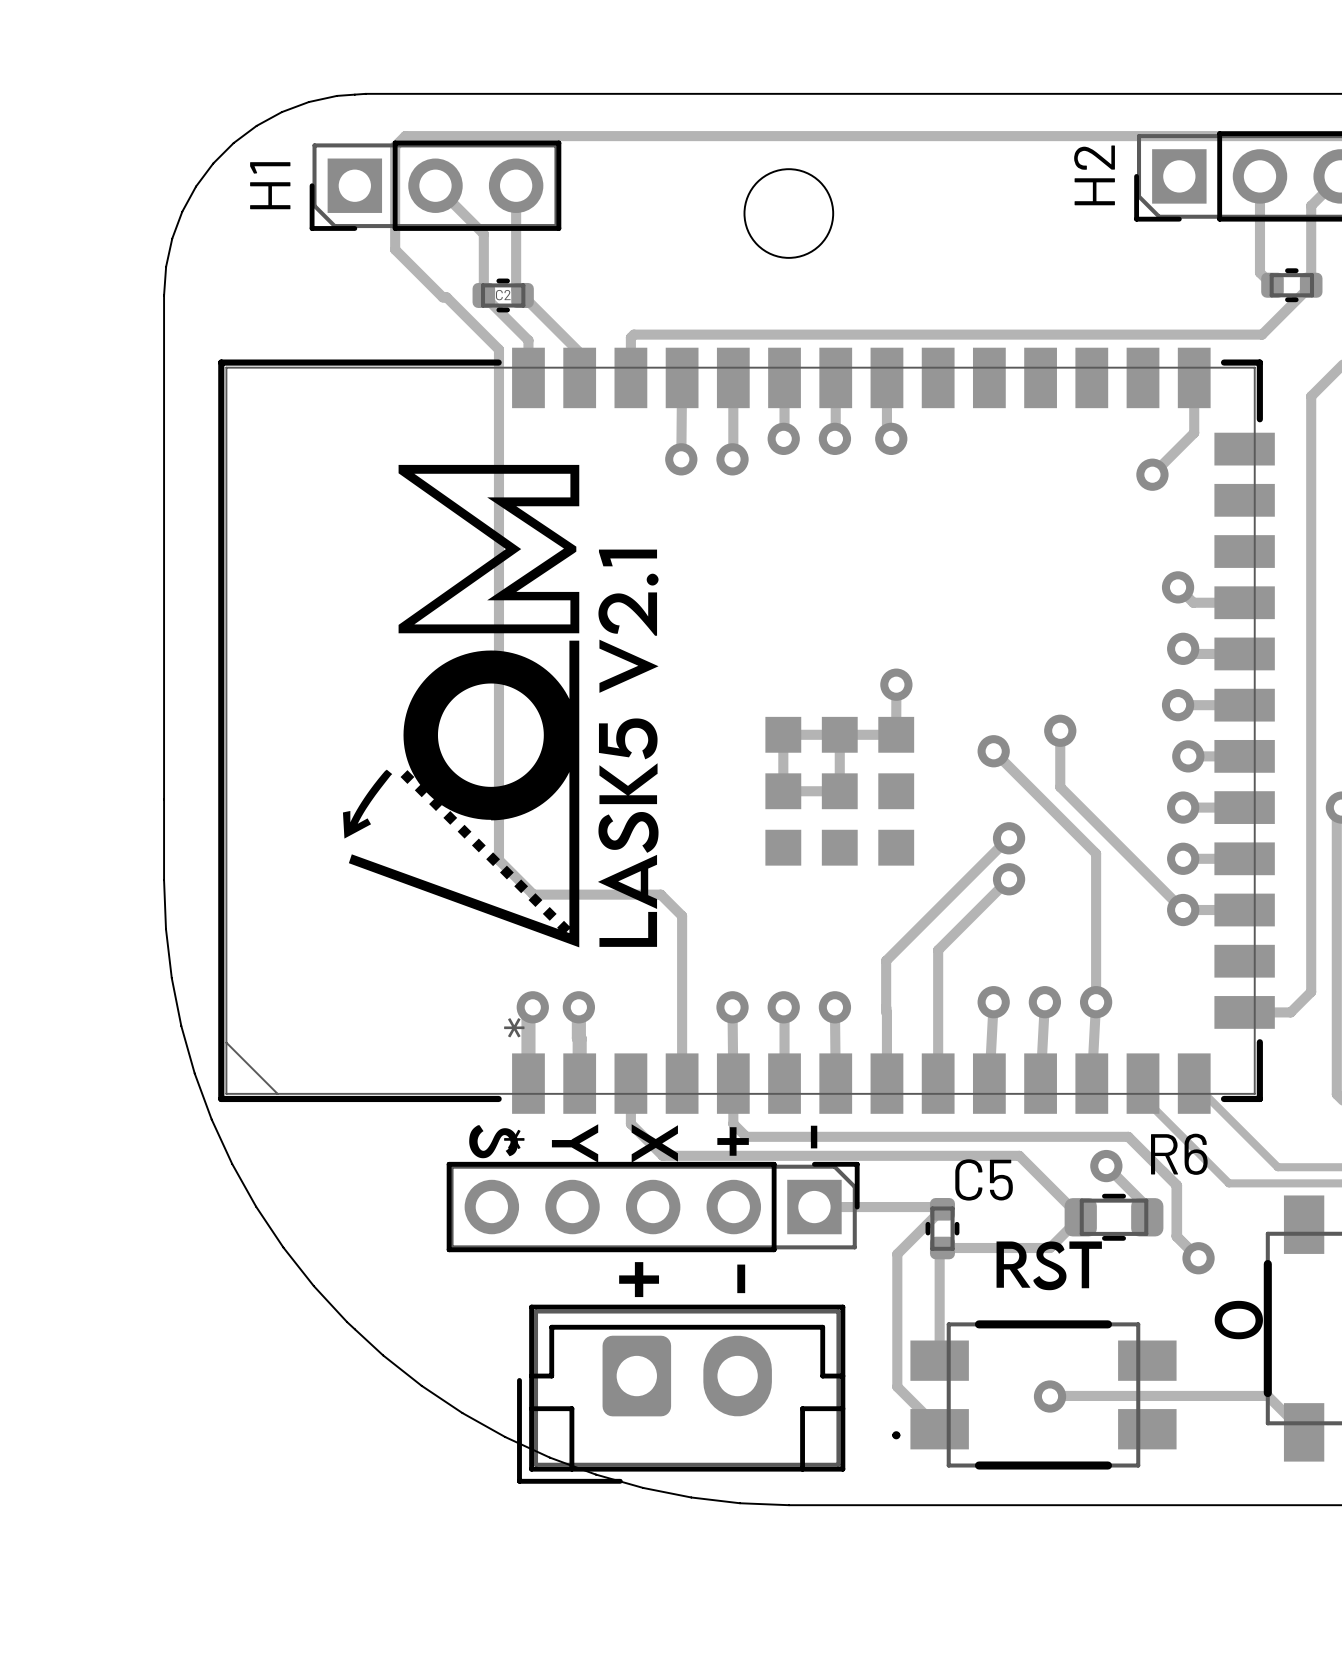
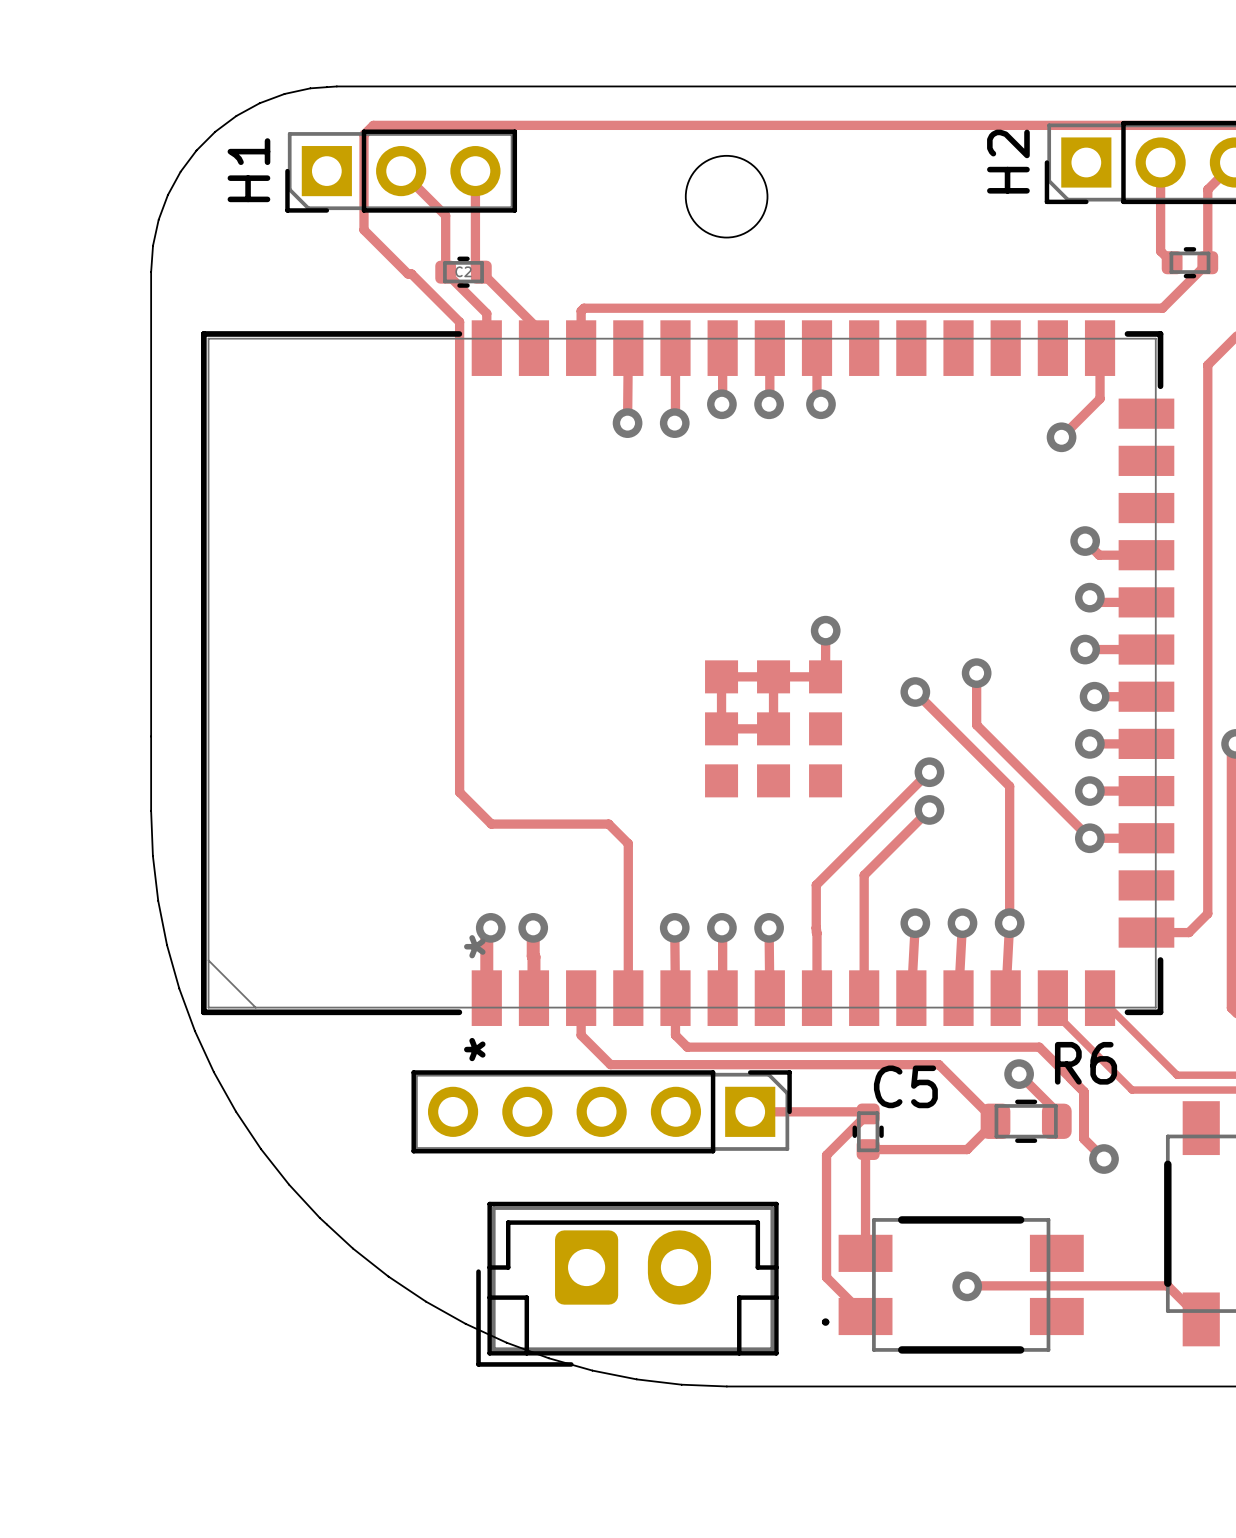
drawing: [342, 464, 659, 948] -> none
drawing: [469, 1124, 749, 1163] -> none
drawing: [810, 1125, 818, 1149] -> none
drawing: [996, 1241, 1102, 1291] -> none
drawing: [619, 1262, 660, 1298] -> none
drawing: [737, 1264, 746, 1294] -> none
drawing: [1214, 1300, 1263, 1340] -> none

